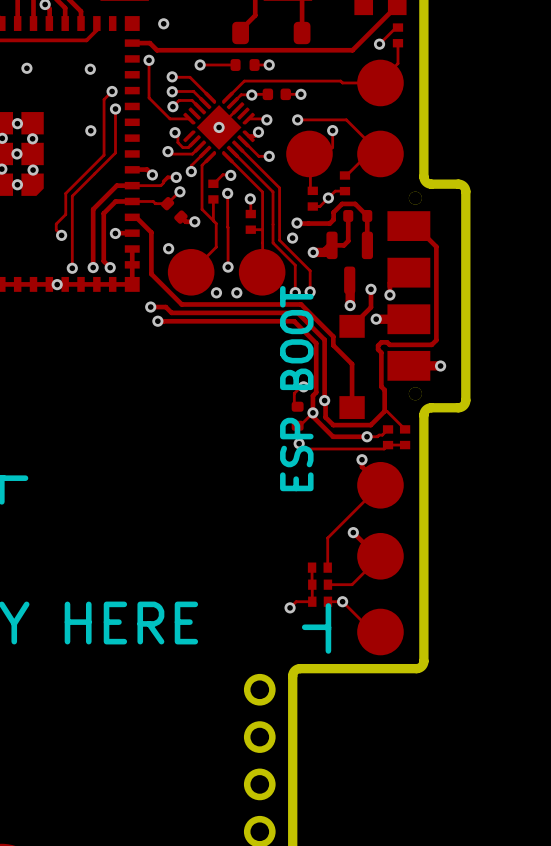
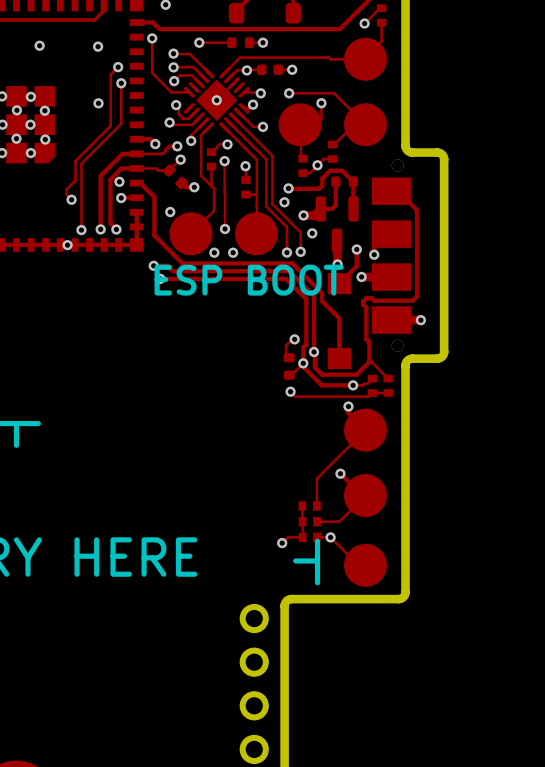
via: none -> (119, 181)
via: none -> (312, 233)
text rotation: 0° (296, 388) -> 90° clockwise (249, 280)

